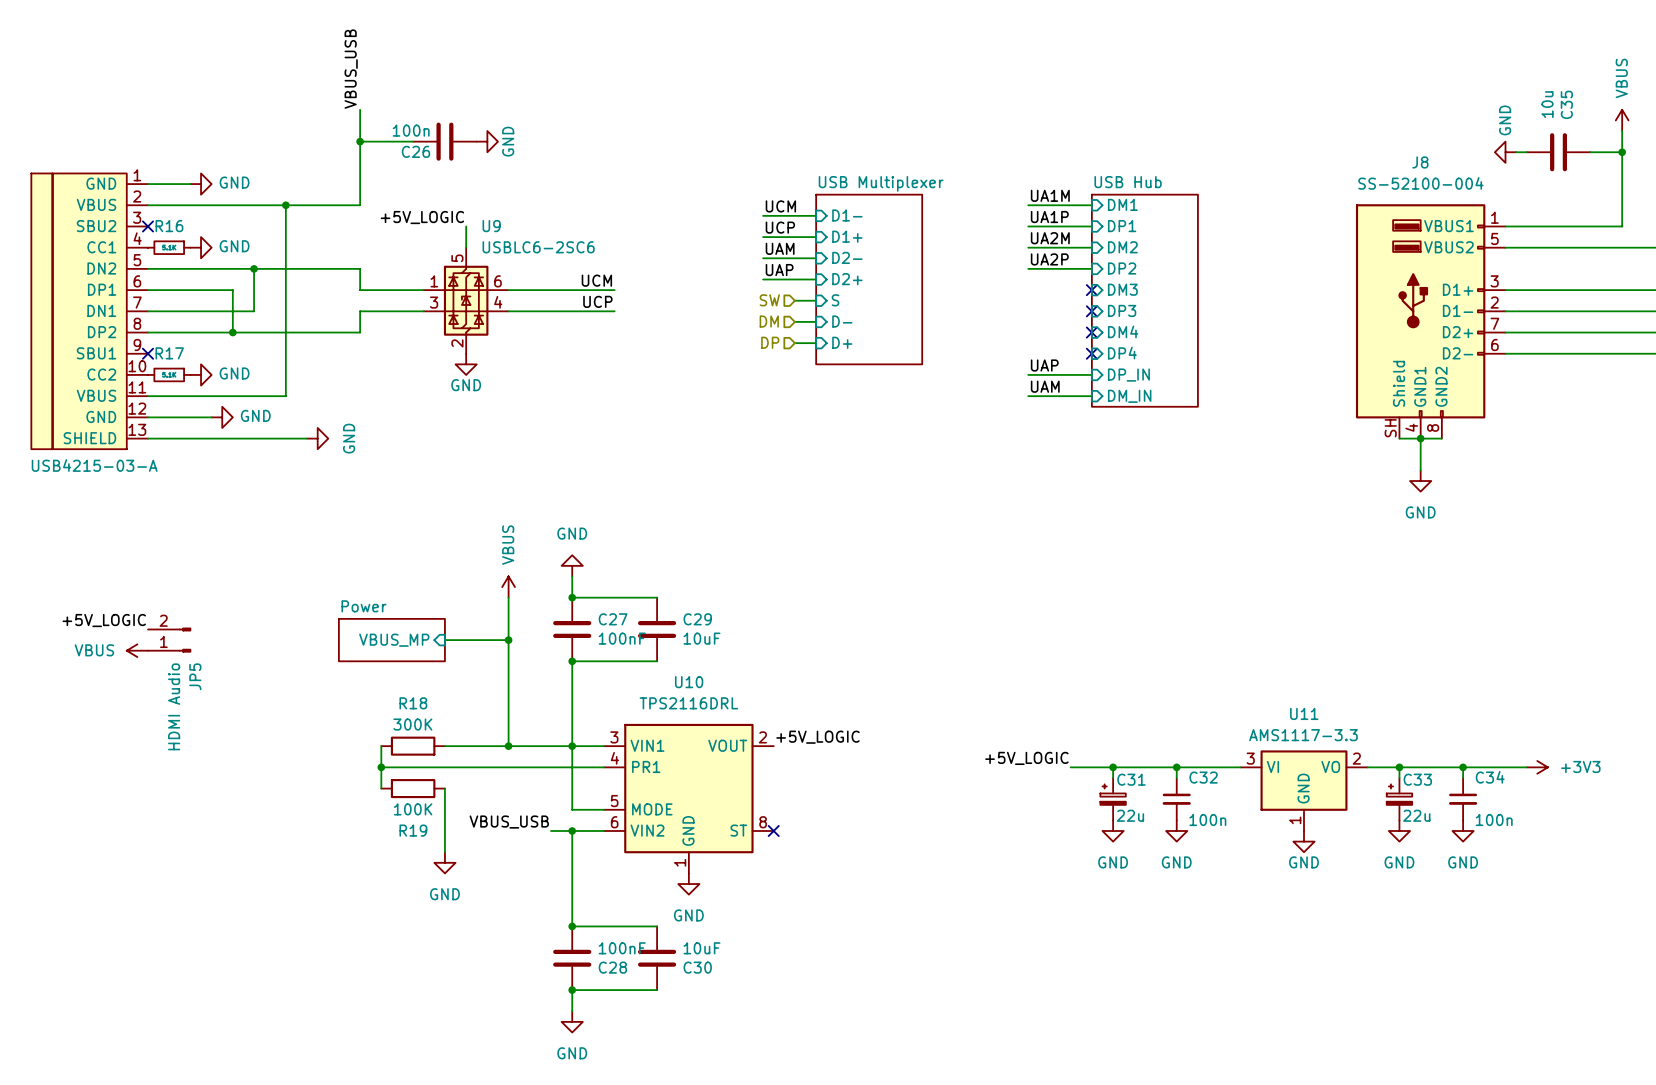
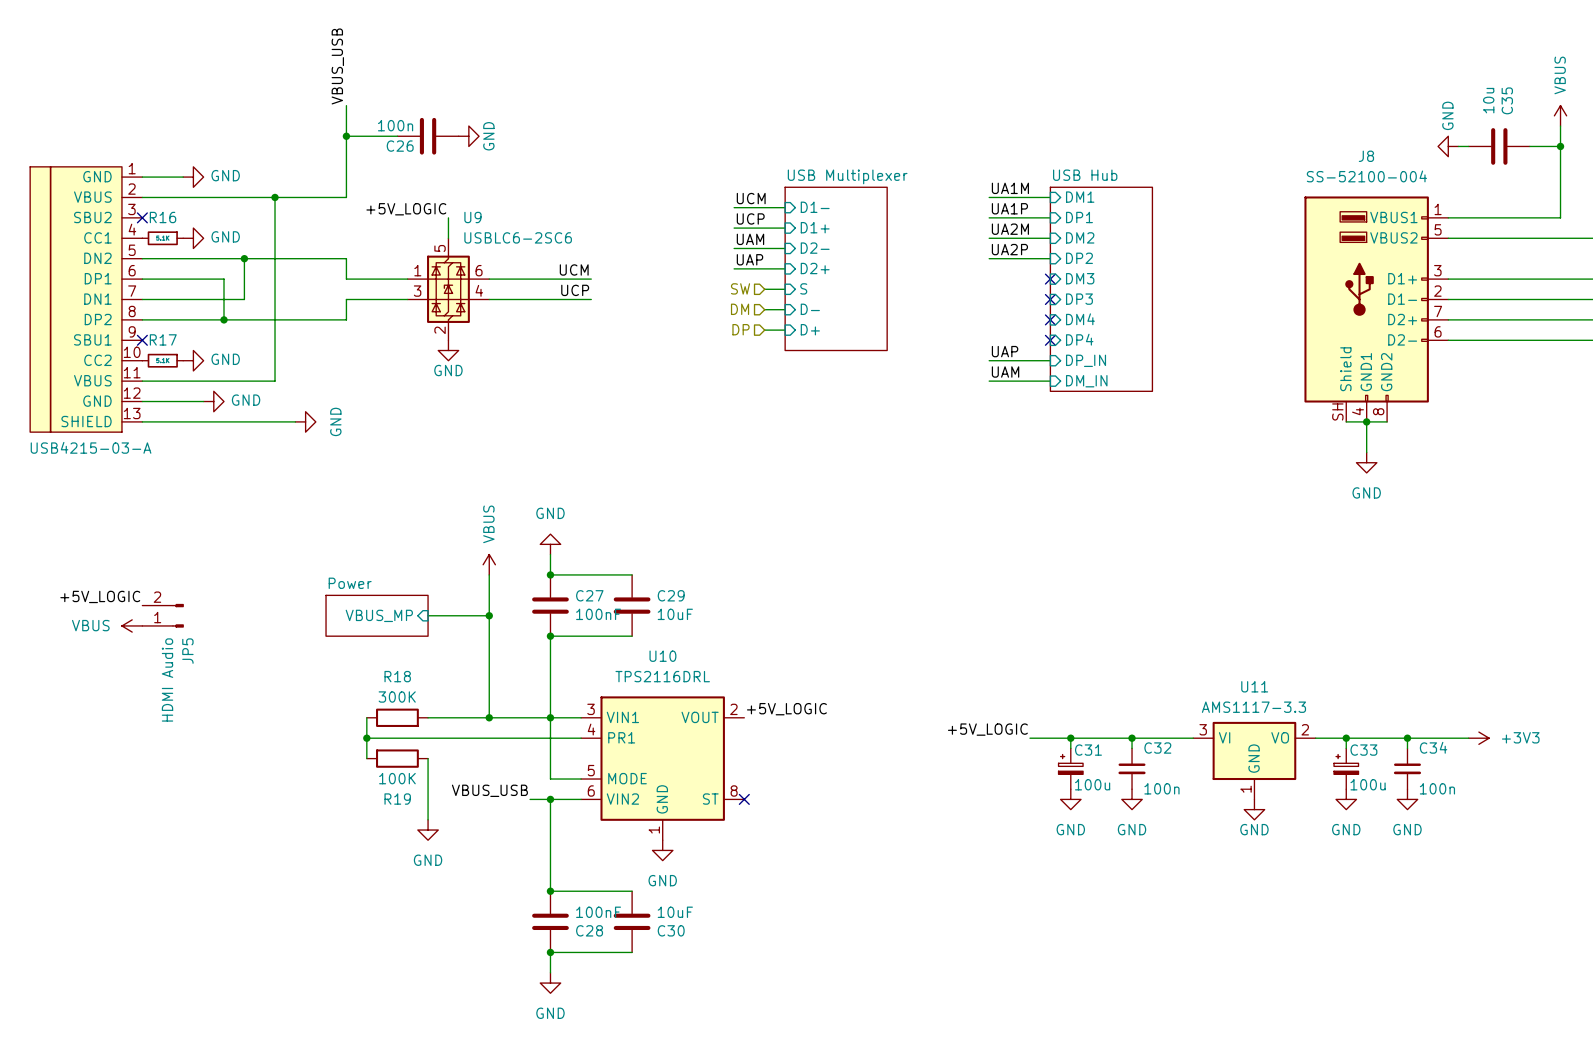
C31 value: 22u (1130, 815) -> 100u (1092, 784)
C33 value: 22u (1416, 815) -> 100u (1368, 784)

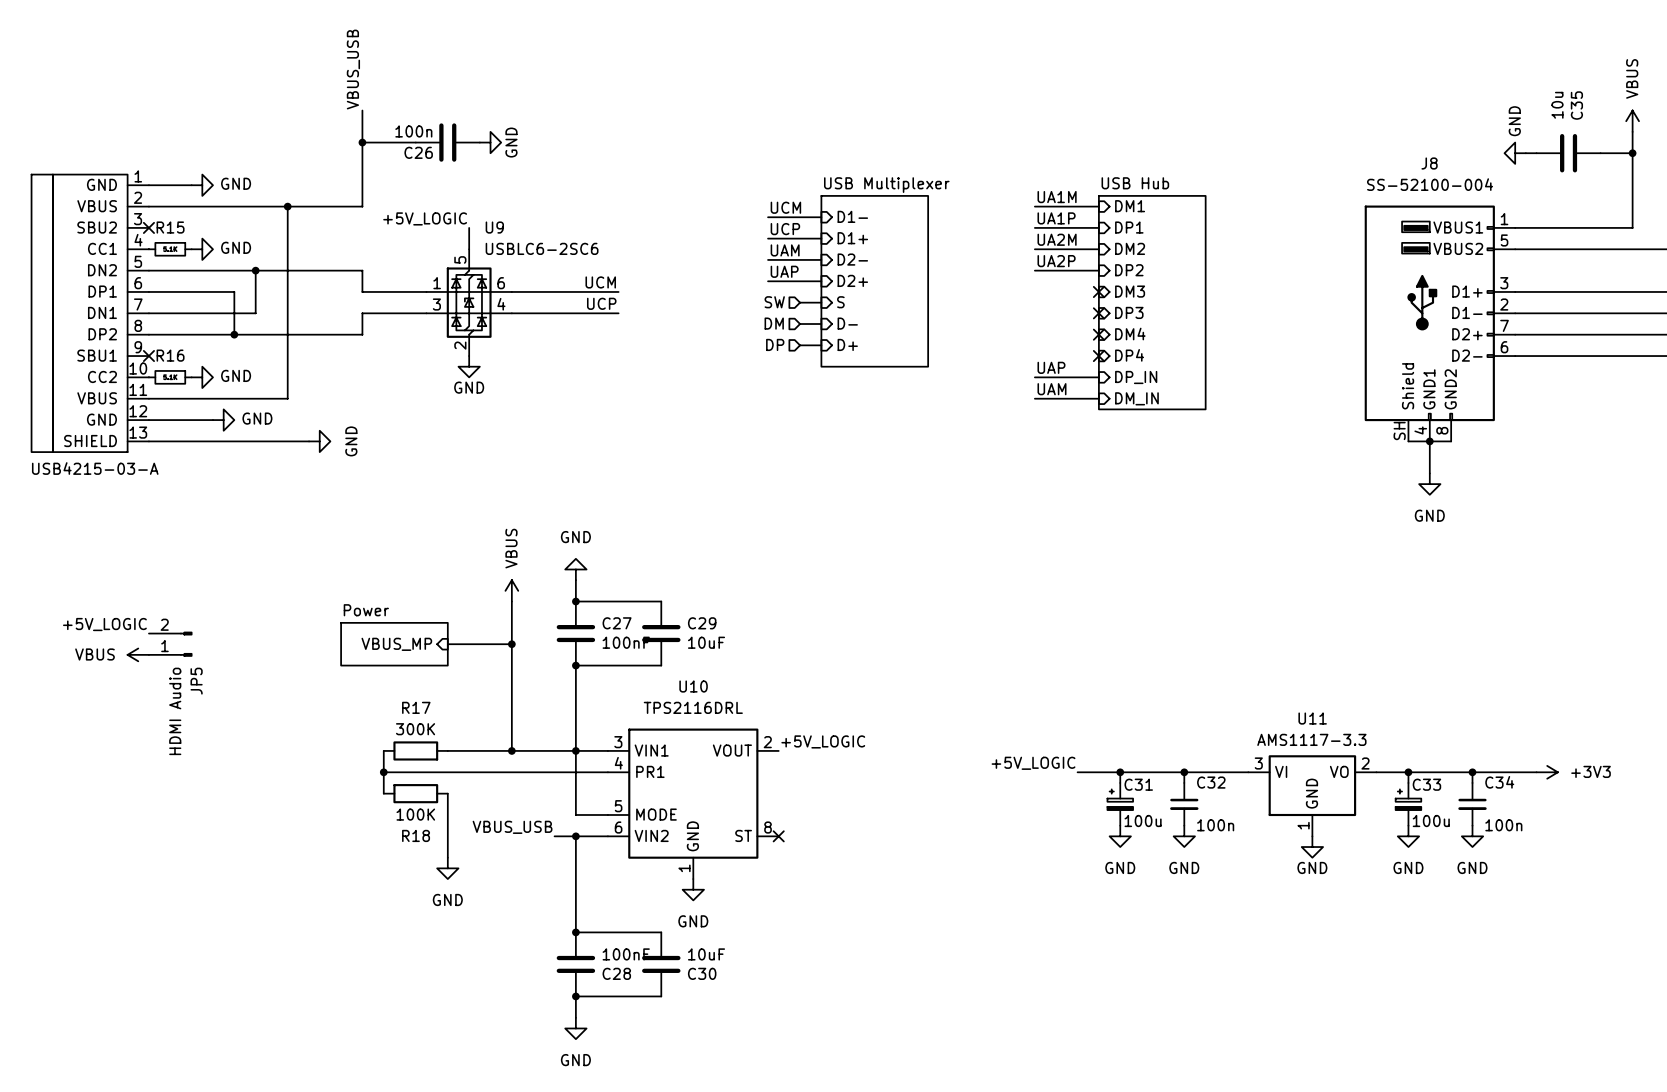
R16 name: R16 (163, 217) -> R15 (170, 227)
R17 name: R17 (163, 339) -> R16 (170, 355)
R18 name: R18 (397, 676) -> R17 (416, 707)
R19 name: R19 (397, 799) -> R18 (416, 835)

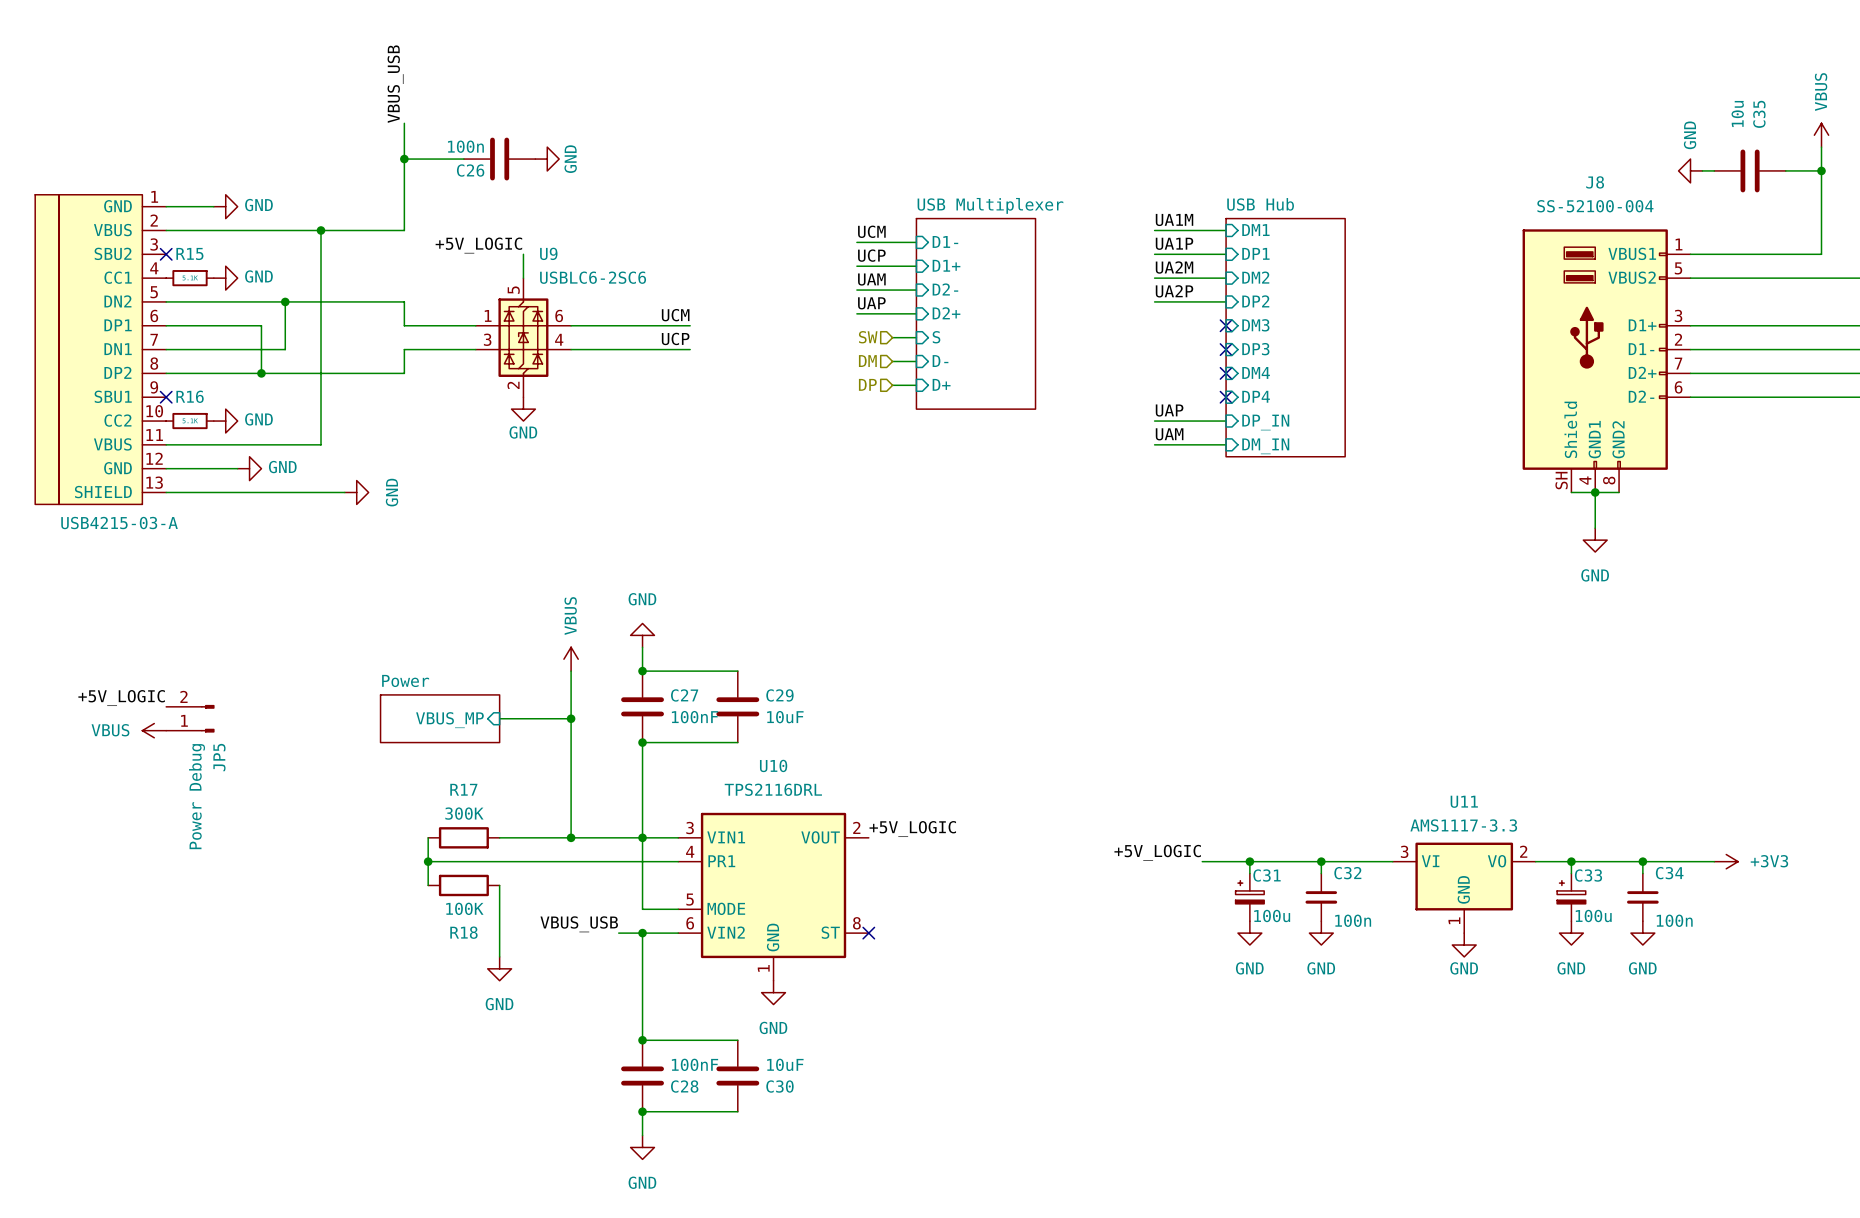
JP5 value: HDMI Audio (175, 711) -> Power Debug (197, 796)

